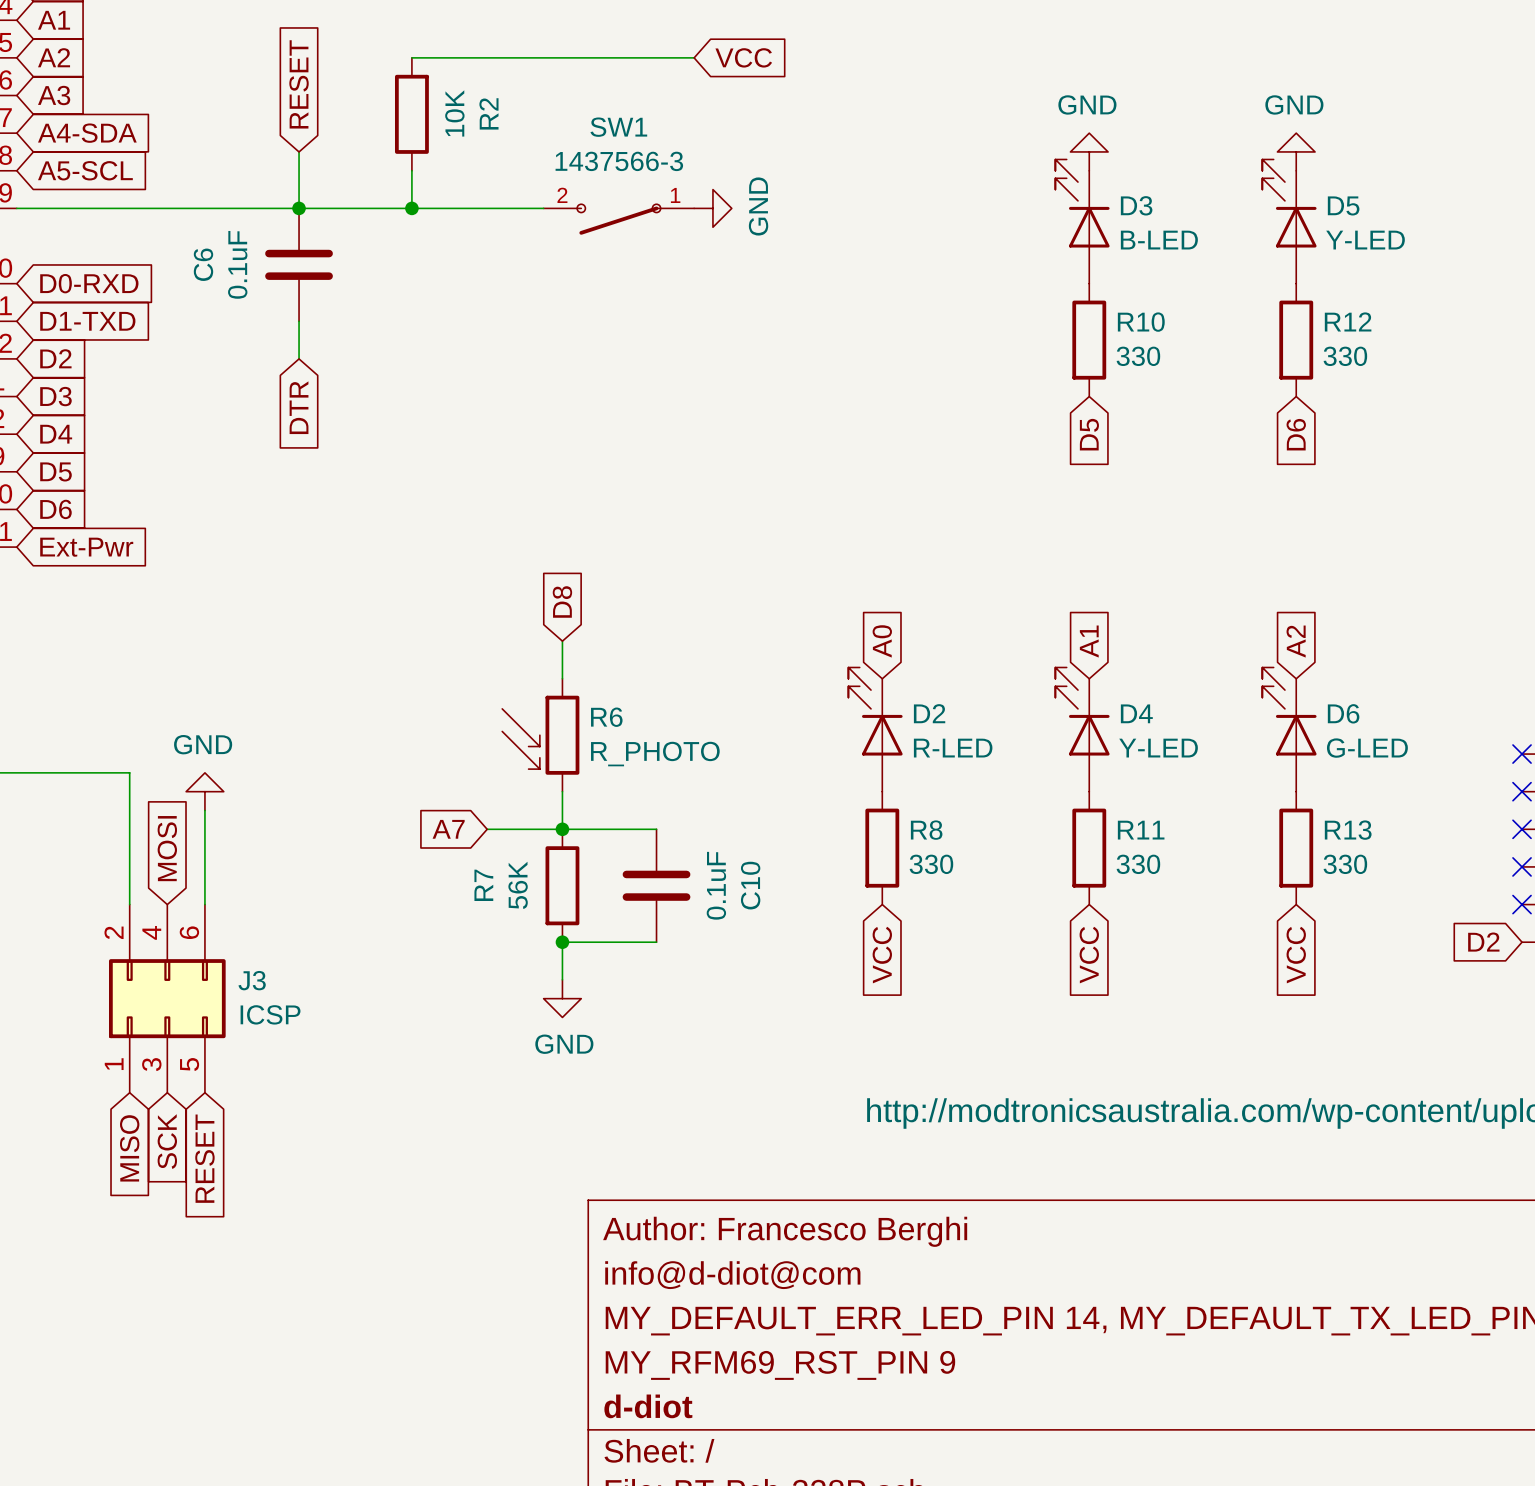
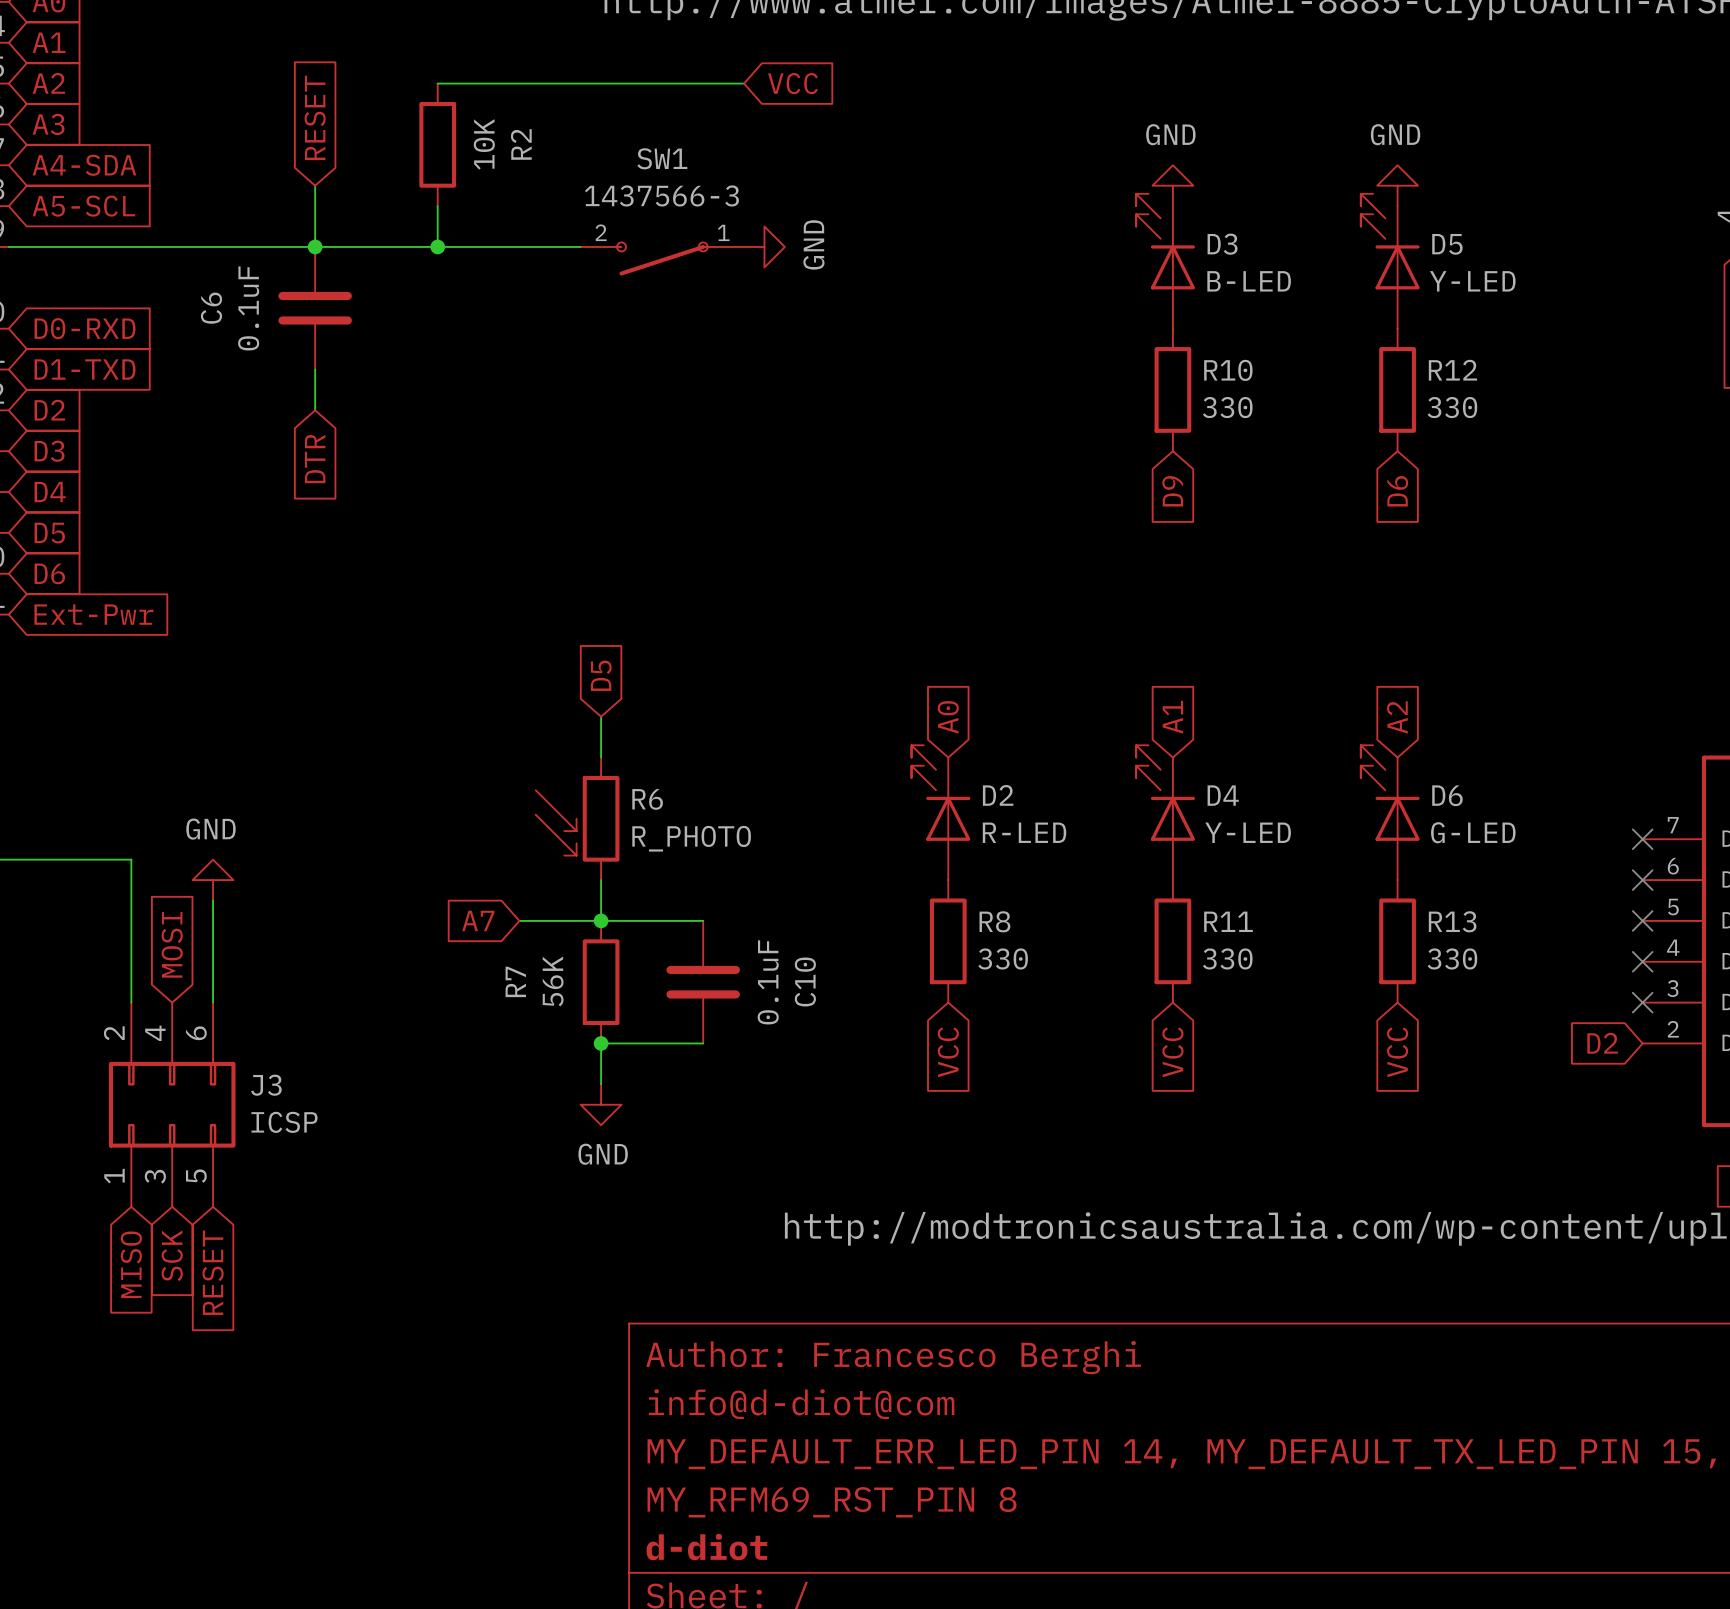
global label: D5 (1089, 434) -> D9 (1172, 491)
global label: D8 (562, 601) -> D5 (601, 675)
title block: MY_RFM69_RST_PIN 9 (780, 1365) -> MY_RFM69_RST_PIN 8 (832, 1502)

